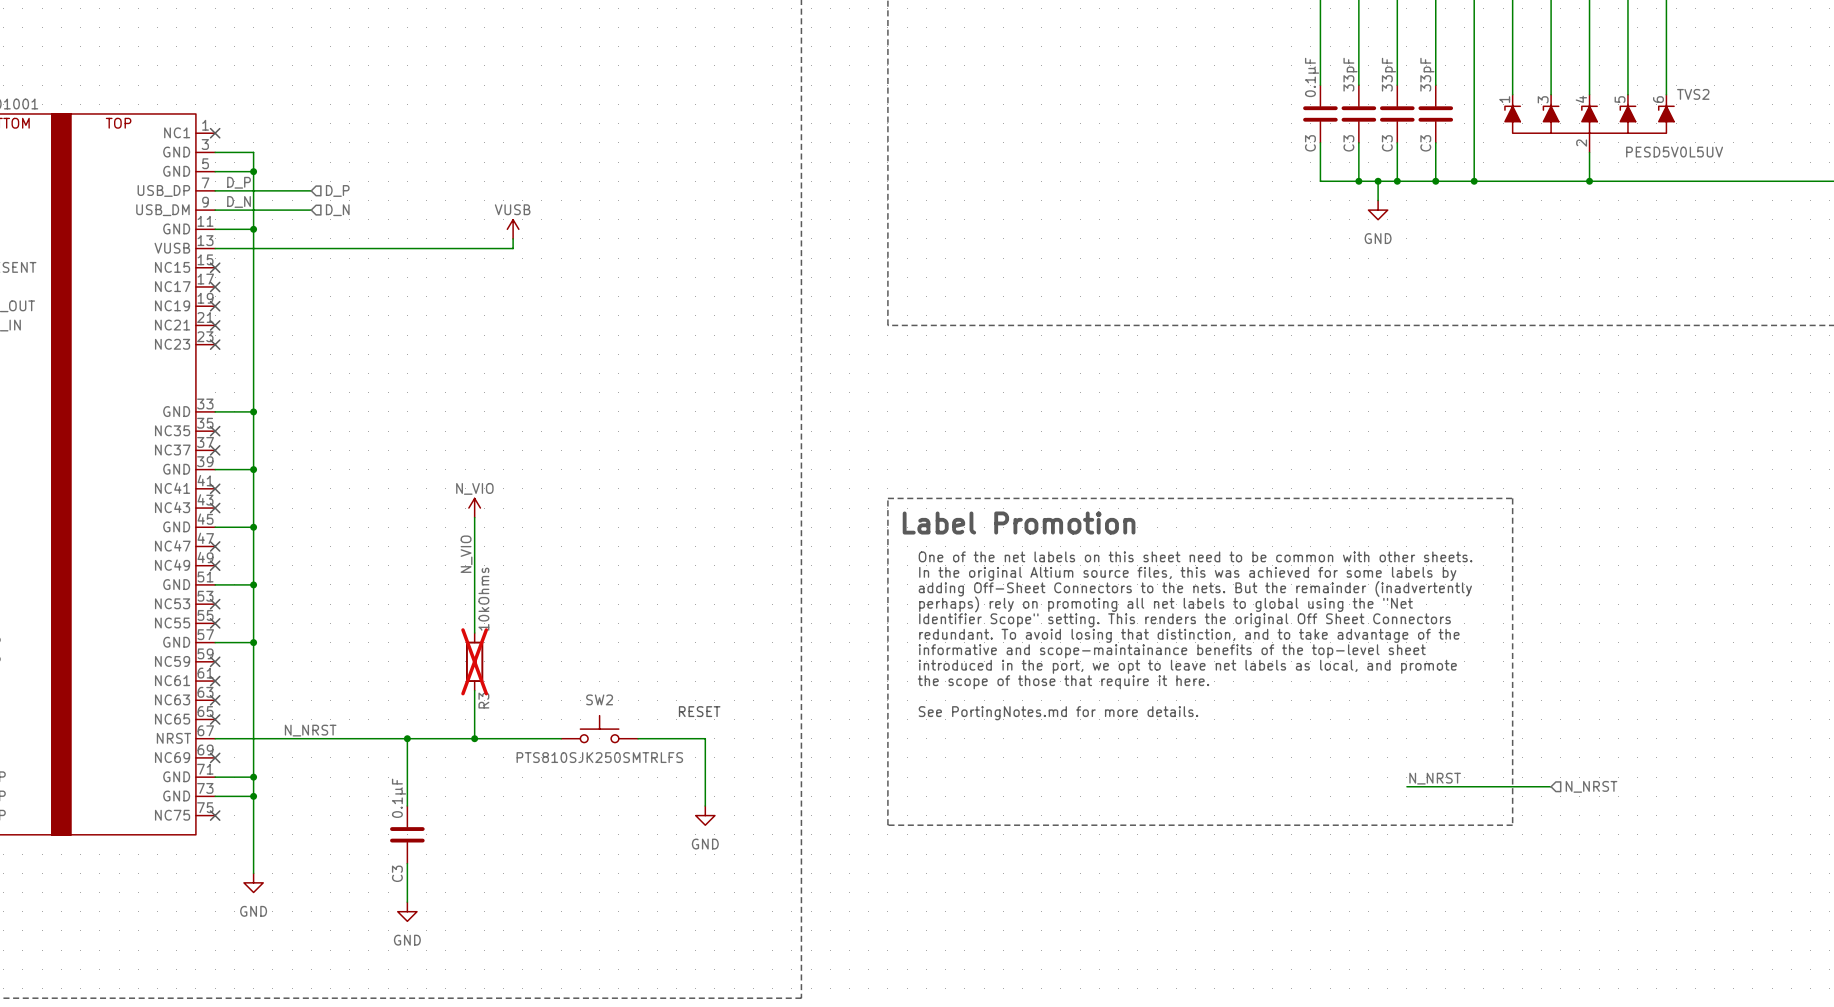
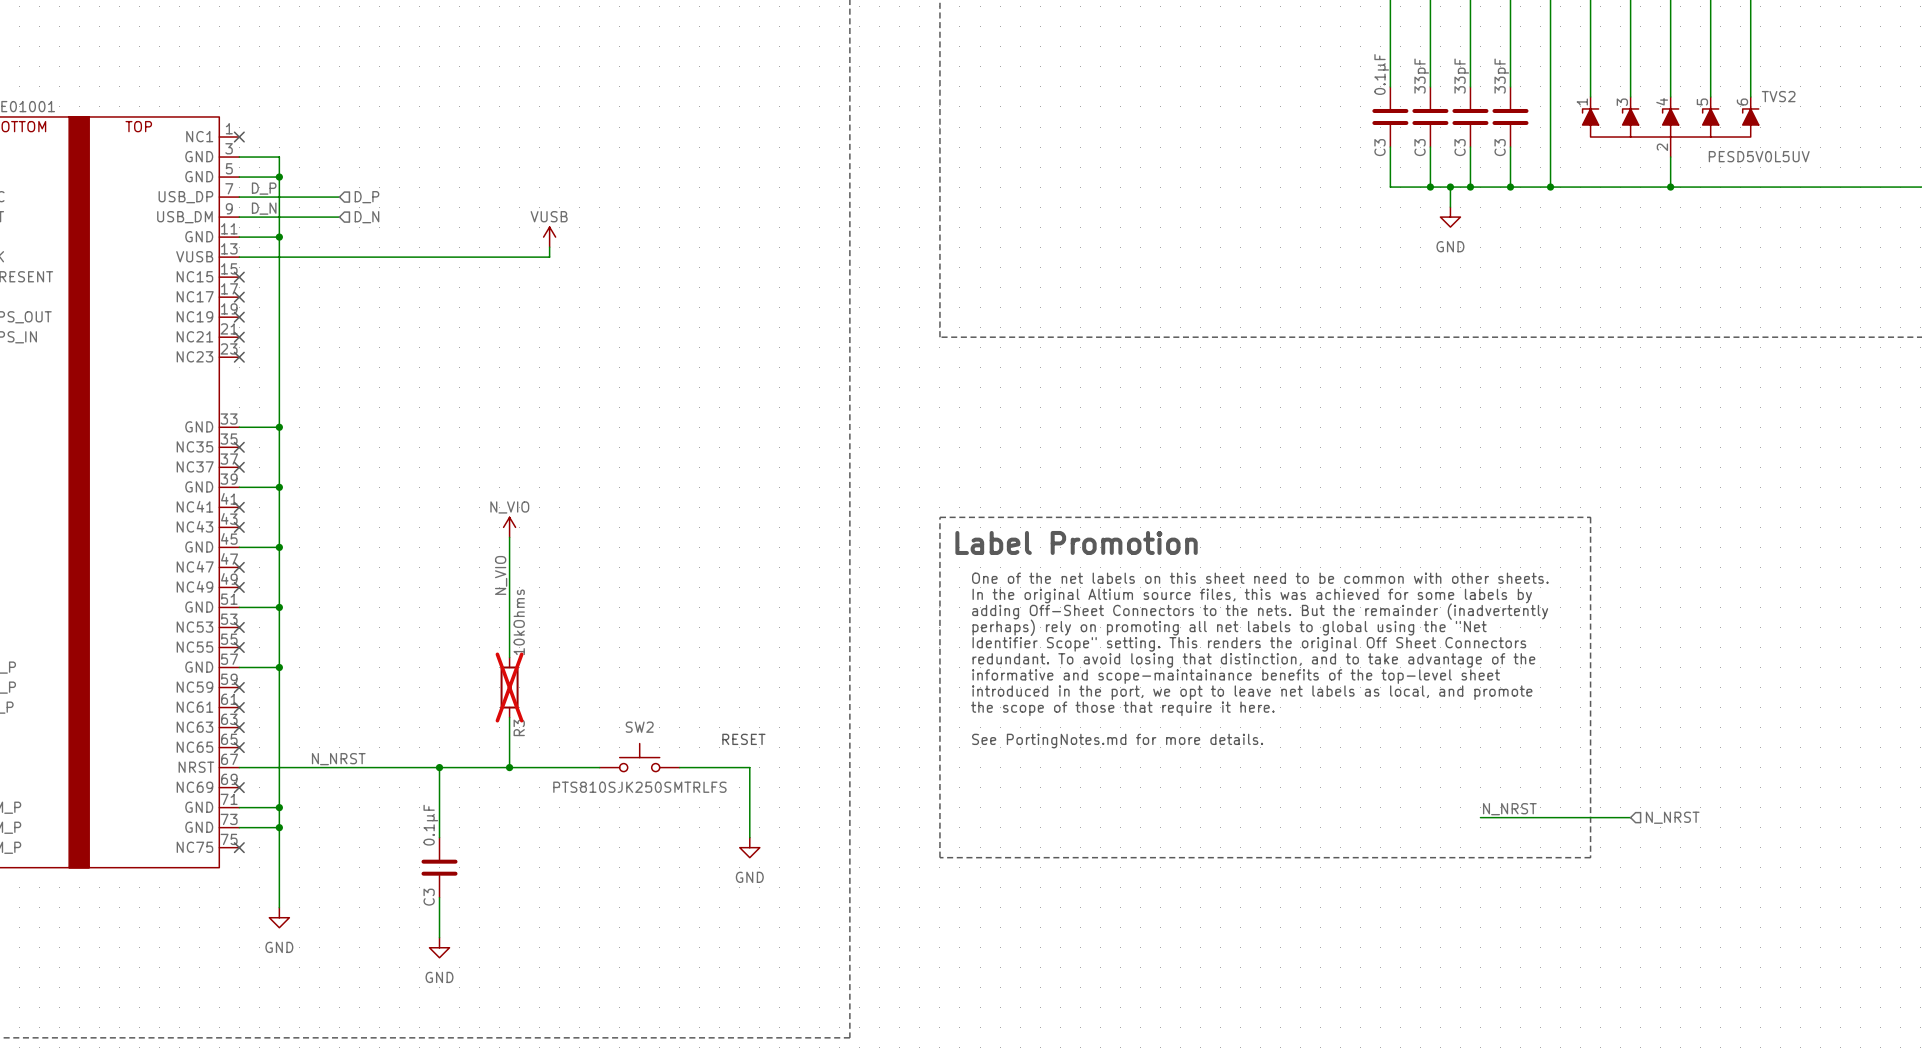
C3 value position: 0.1µF (1312, 77) -> 0.1µF (1381, 74)
C3 value position: 0.1µF (399, 798) -> 0.1µF (430, 825)
C3 name position: C3 (397, 873) -> C3 (429, 897)

